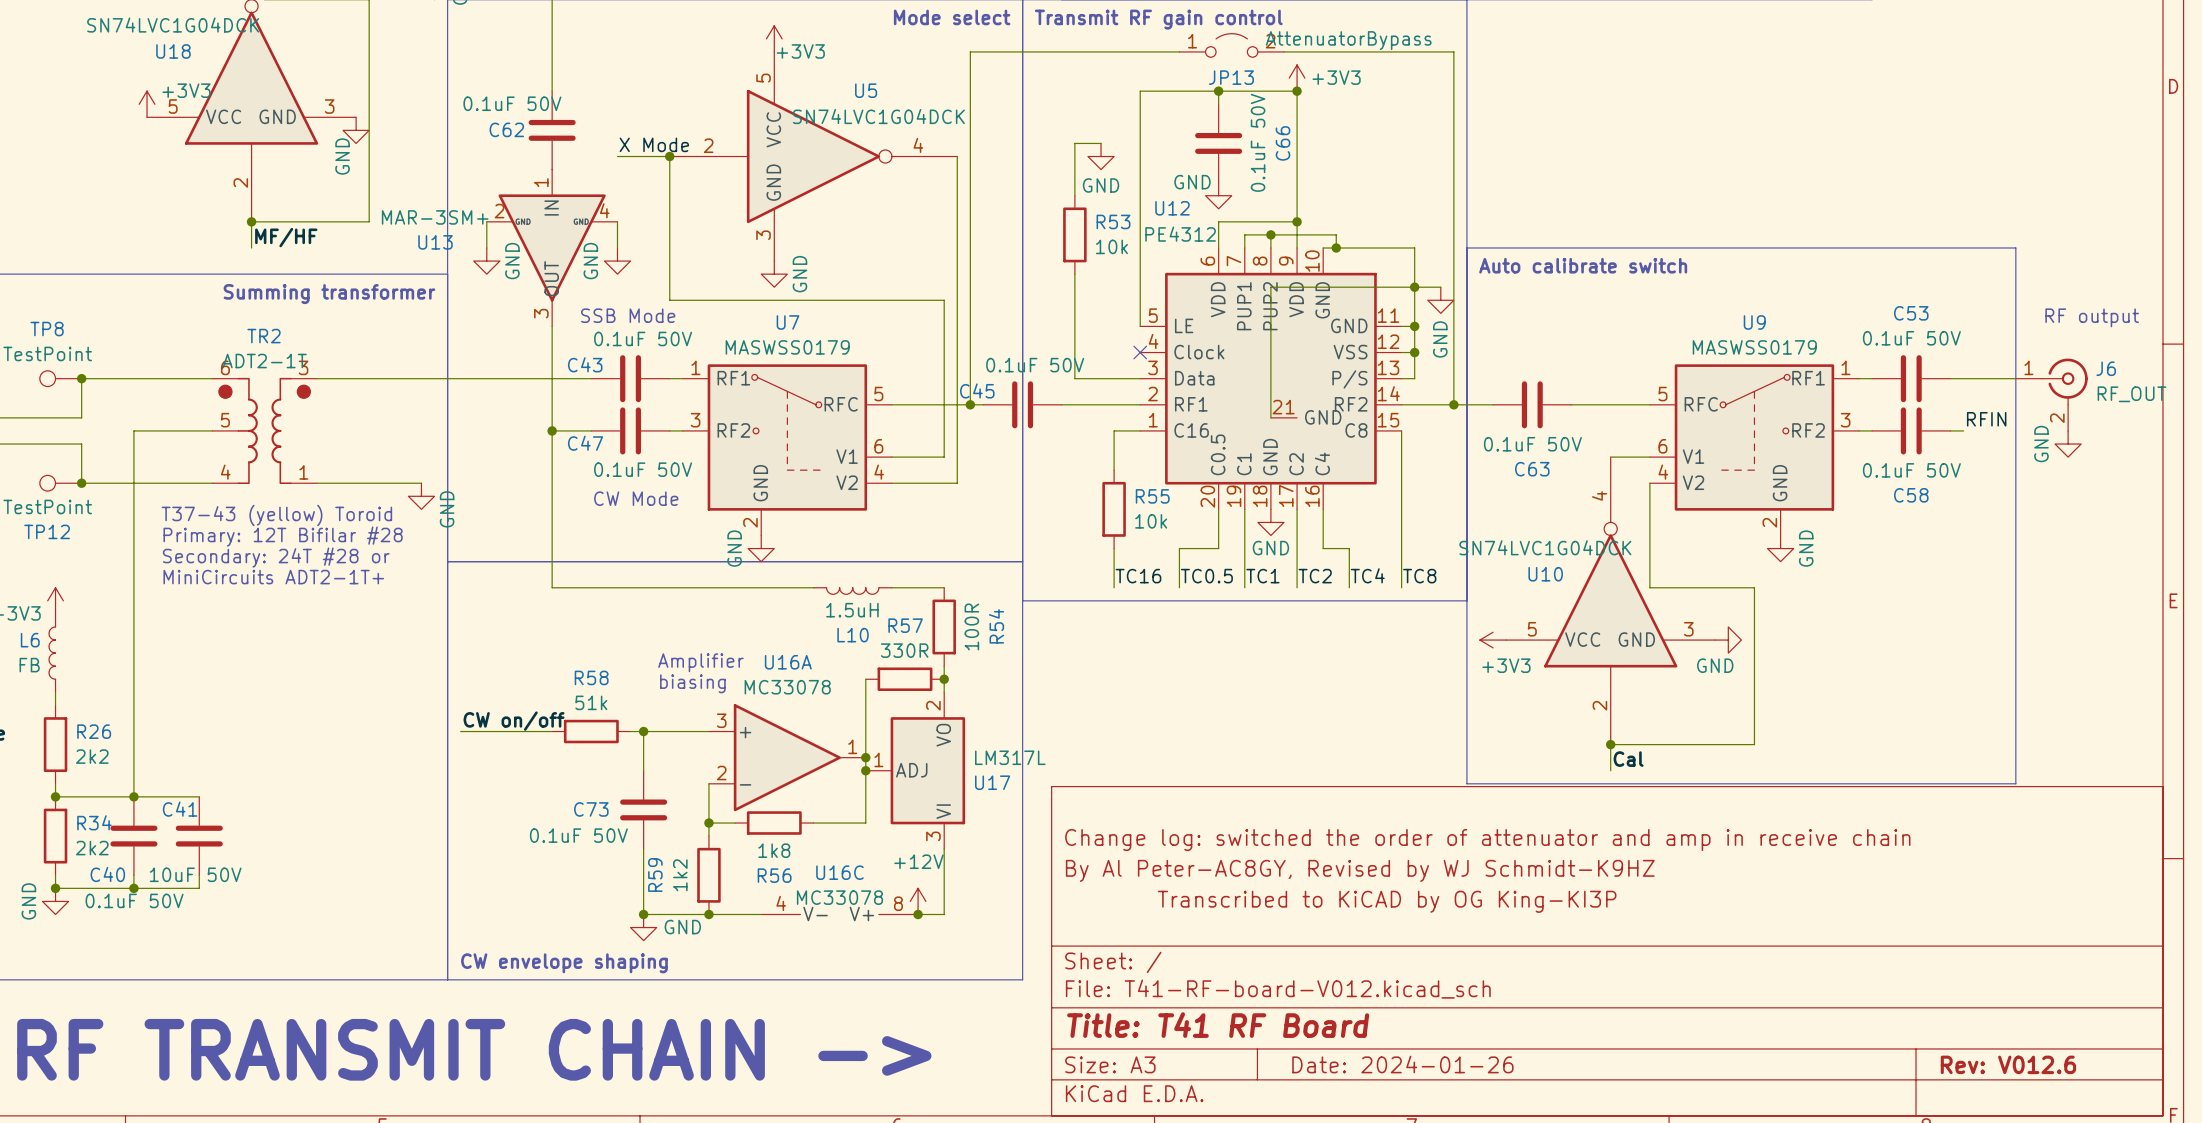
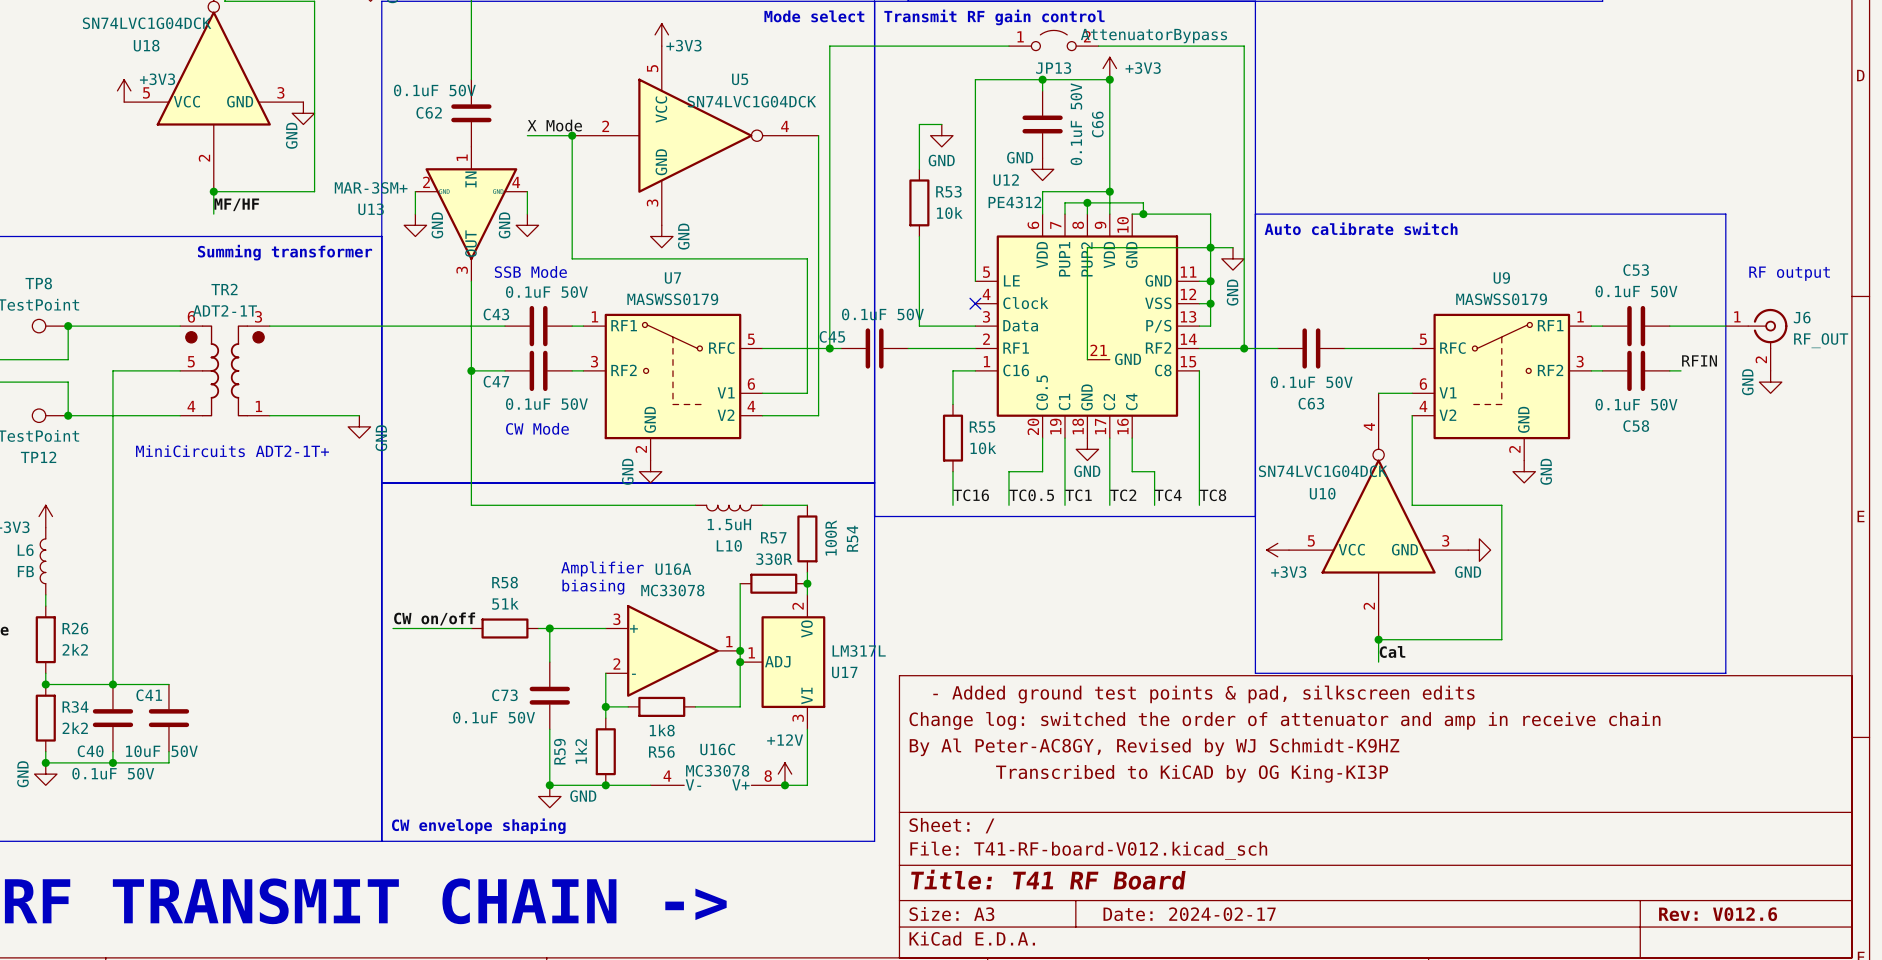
text: T37-43 (yellow) Toroid (276, 515) -> none
text: Primary: 12T Bifilar #28 (283, 536) -> none
text: Secondary: 24T #28 or (276, 557) -> none
text position: MiniCircuits ADT2-1T+ (273, 577) -> MiniCircuits ADT2-1T+ (232, 451)
title block: none -> - Added ground test points & pad, silkscreen edits (1203, 694)
title block: Date: 2024-01-26 (1402, 1064) -> Date: 2024-02-17 (1189, 914)

